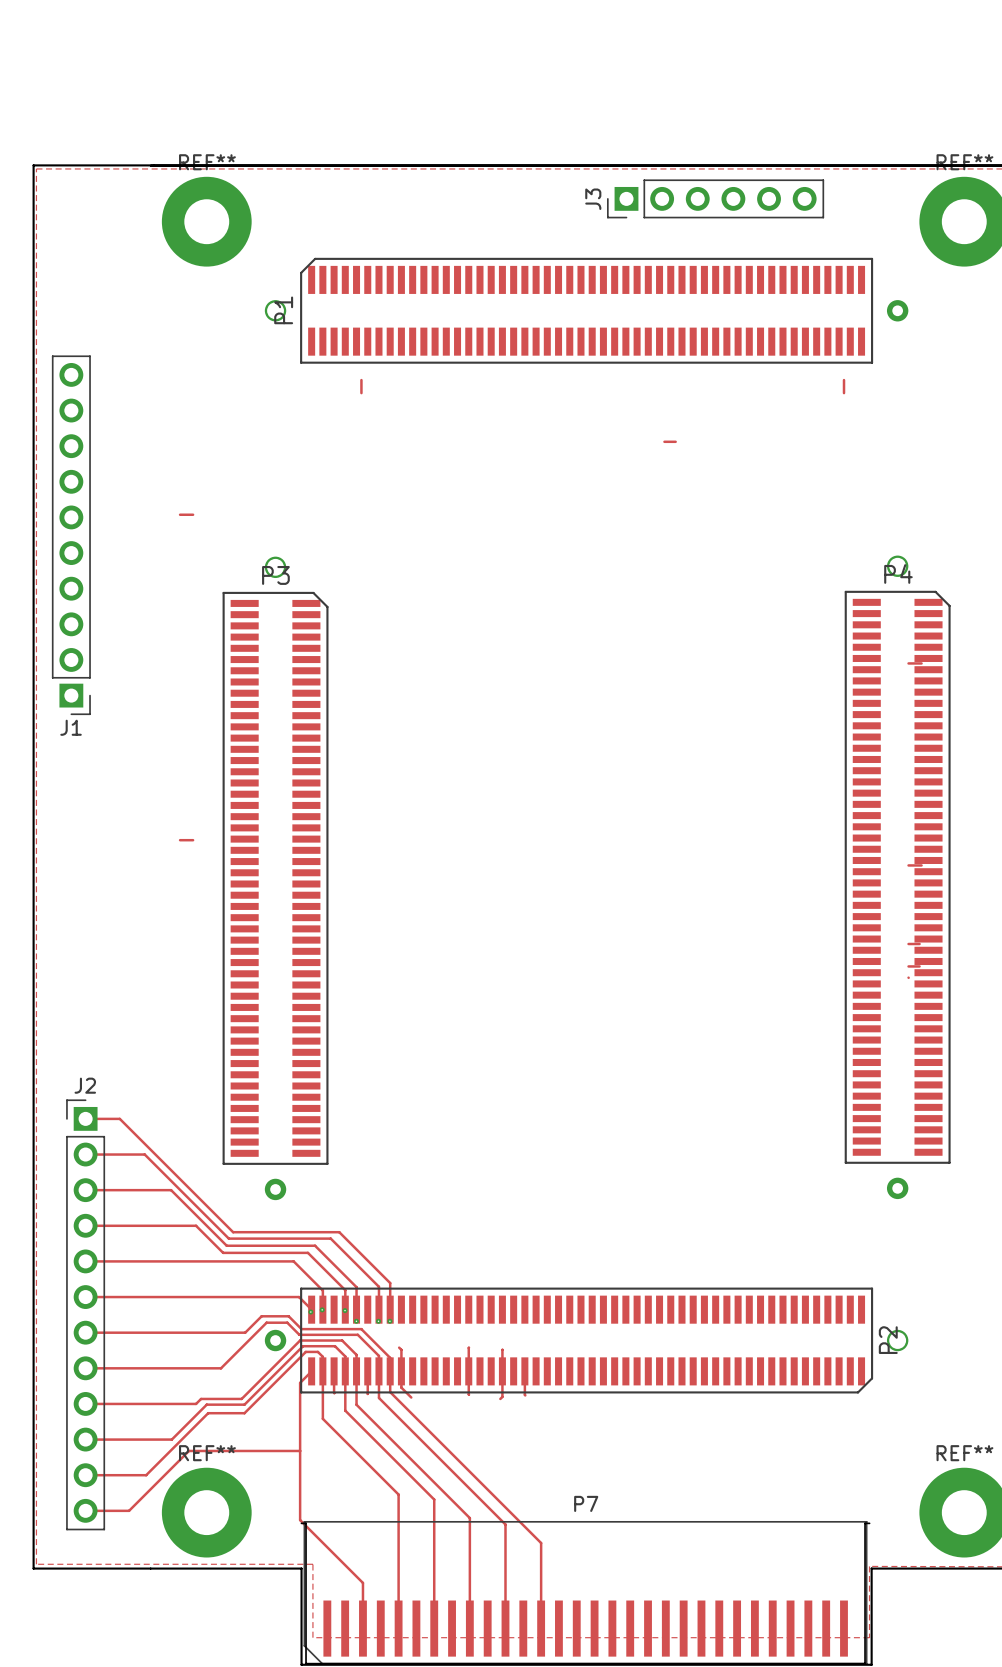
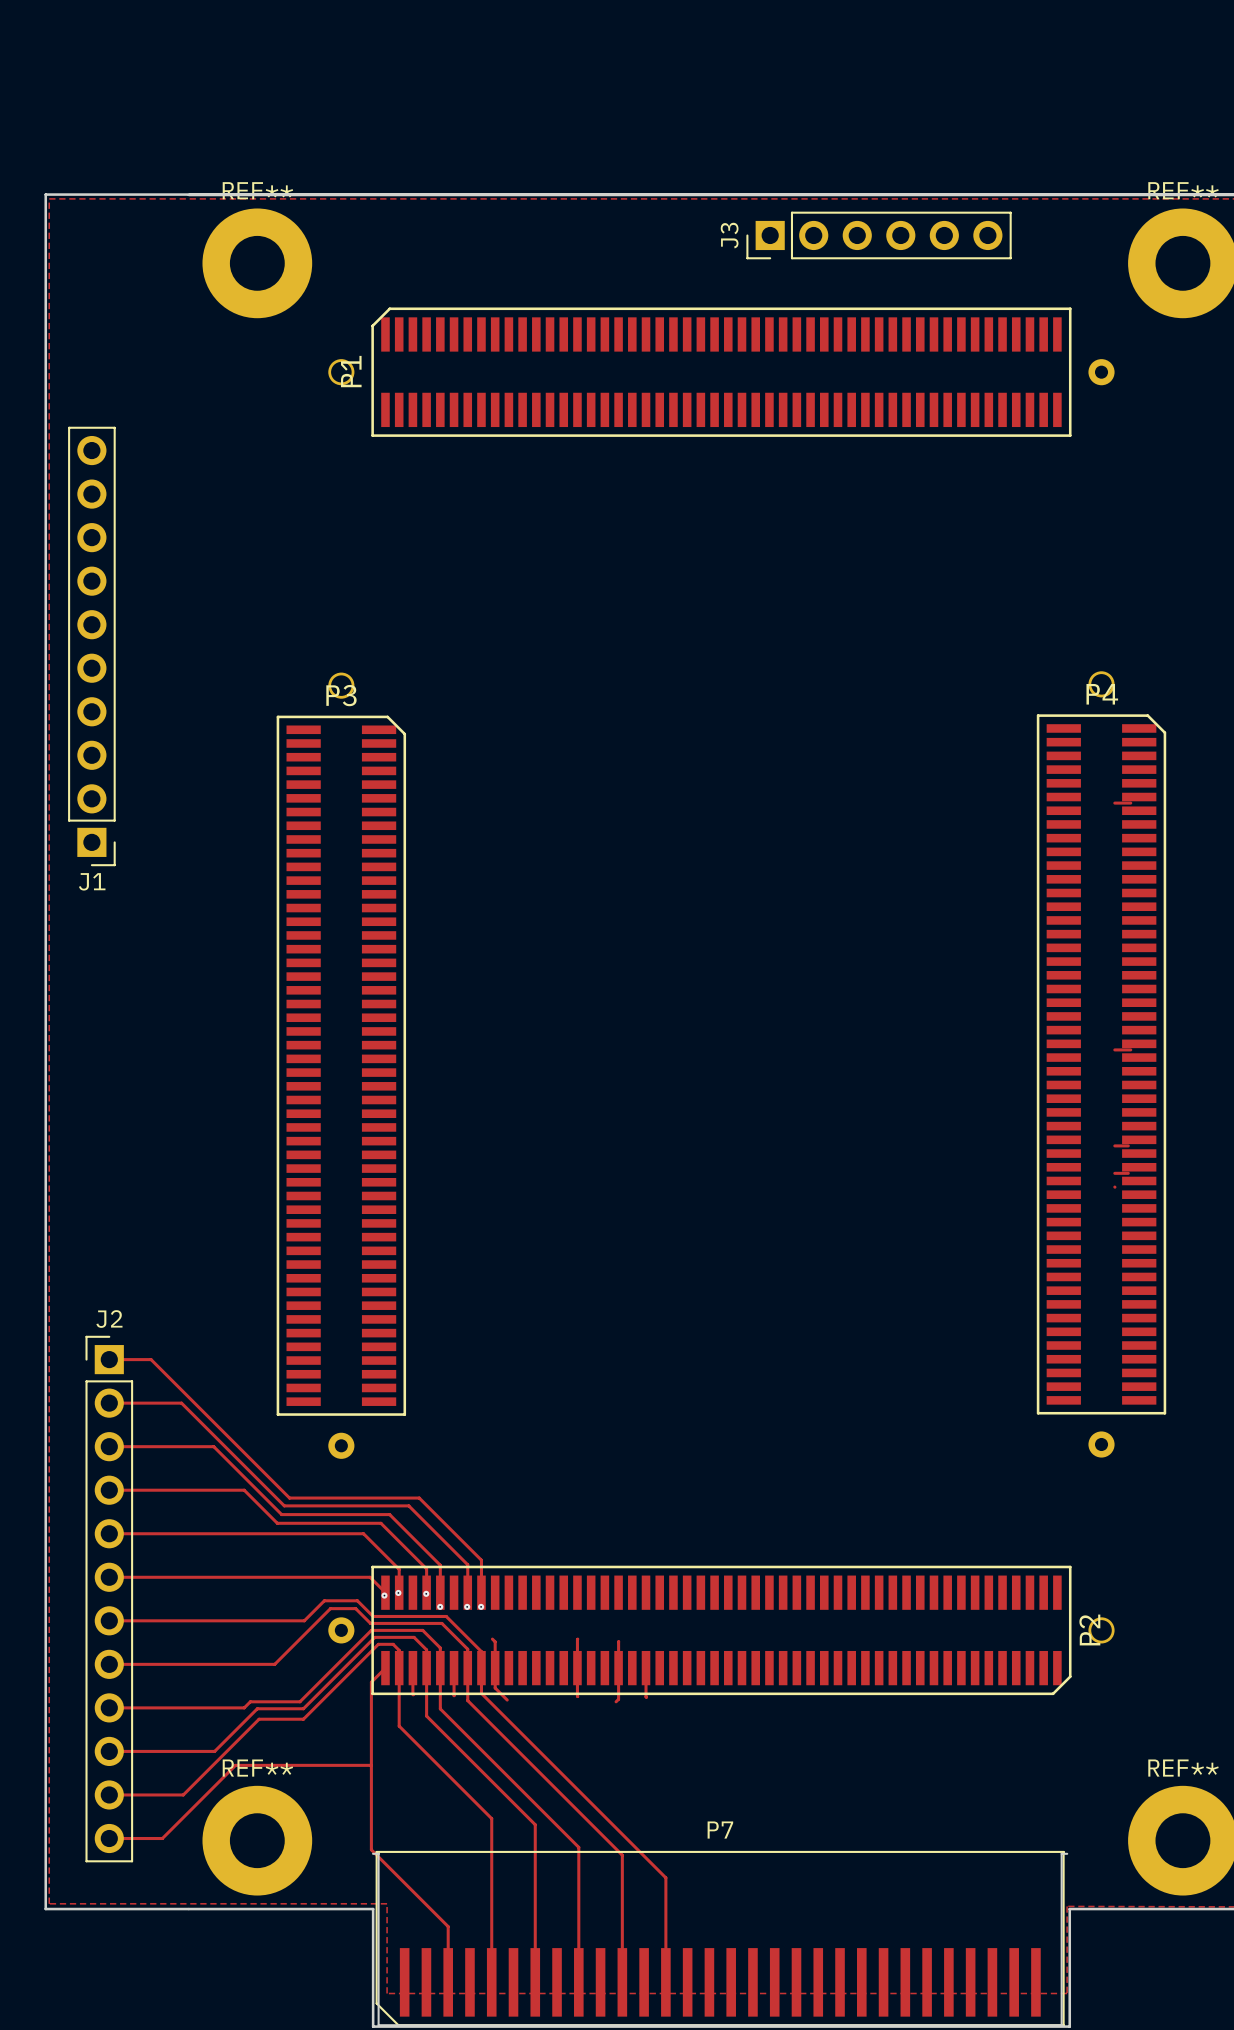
track: (361, 380) (361, 393) -> none
track: (844, 380) (844, 393) -> none
track: (664, 441) (675, 441) -> none
track: (180, 514) (193, 514) -> none
track: (180, 840) (193, 840) -> none

